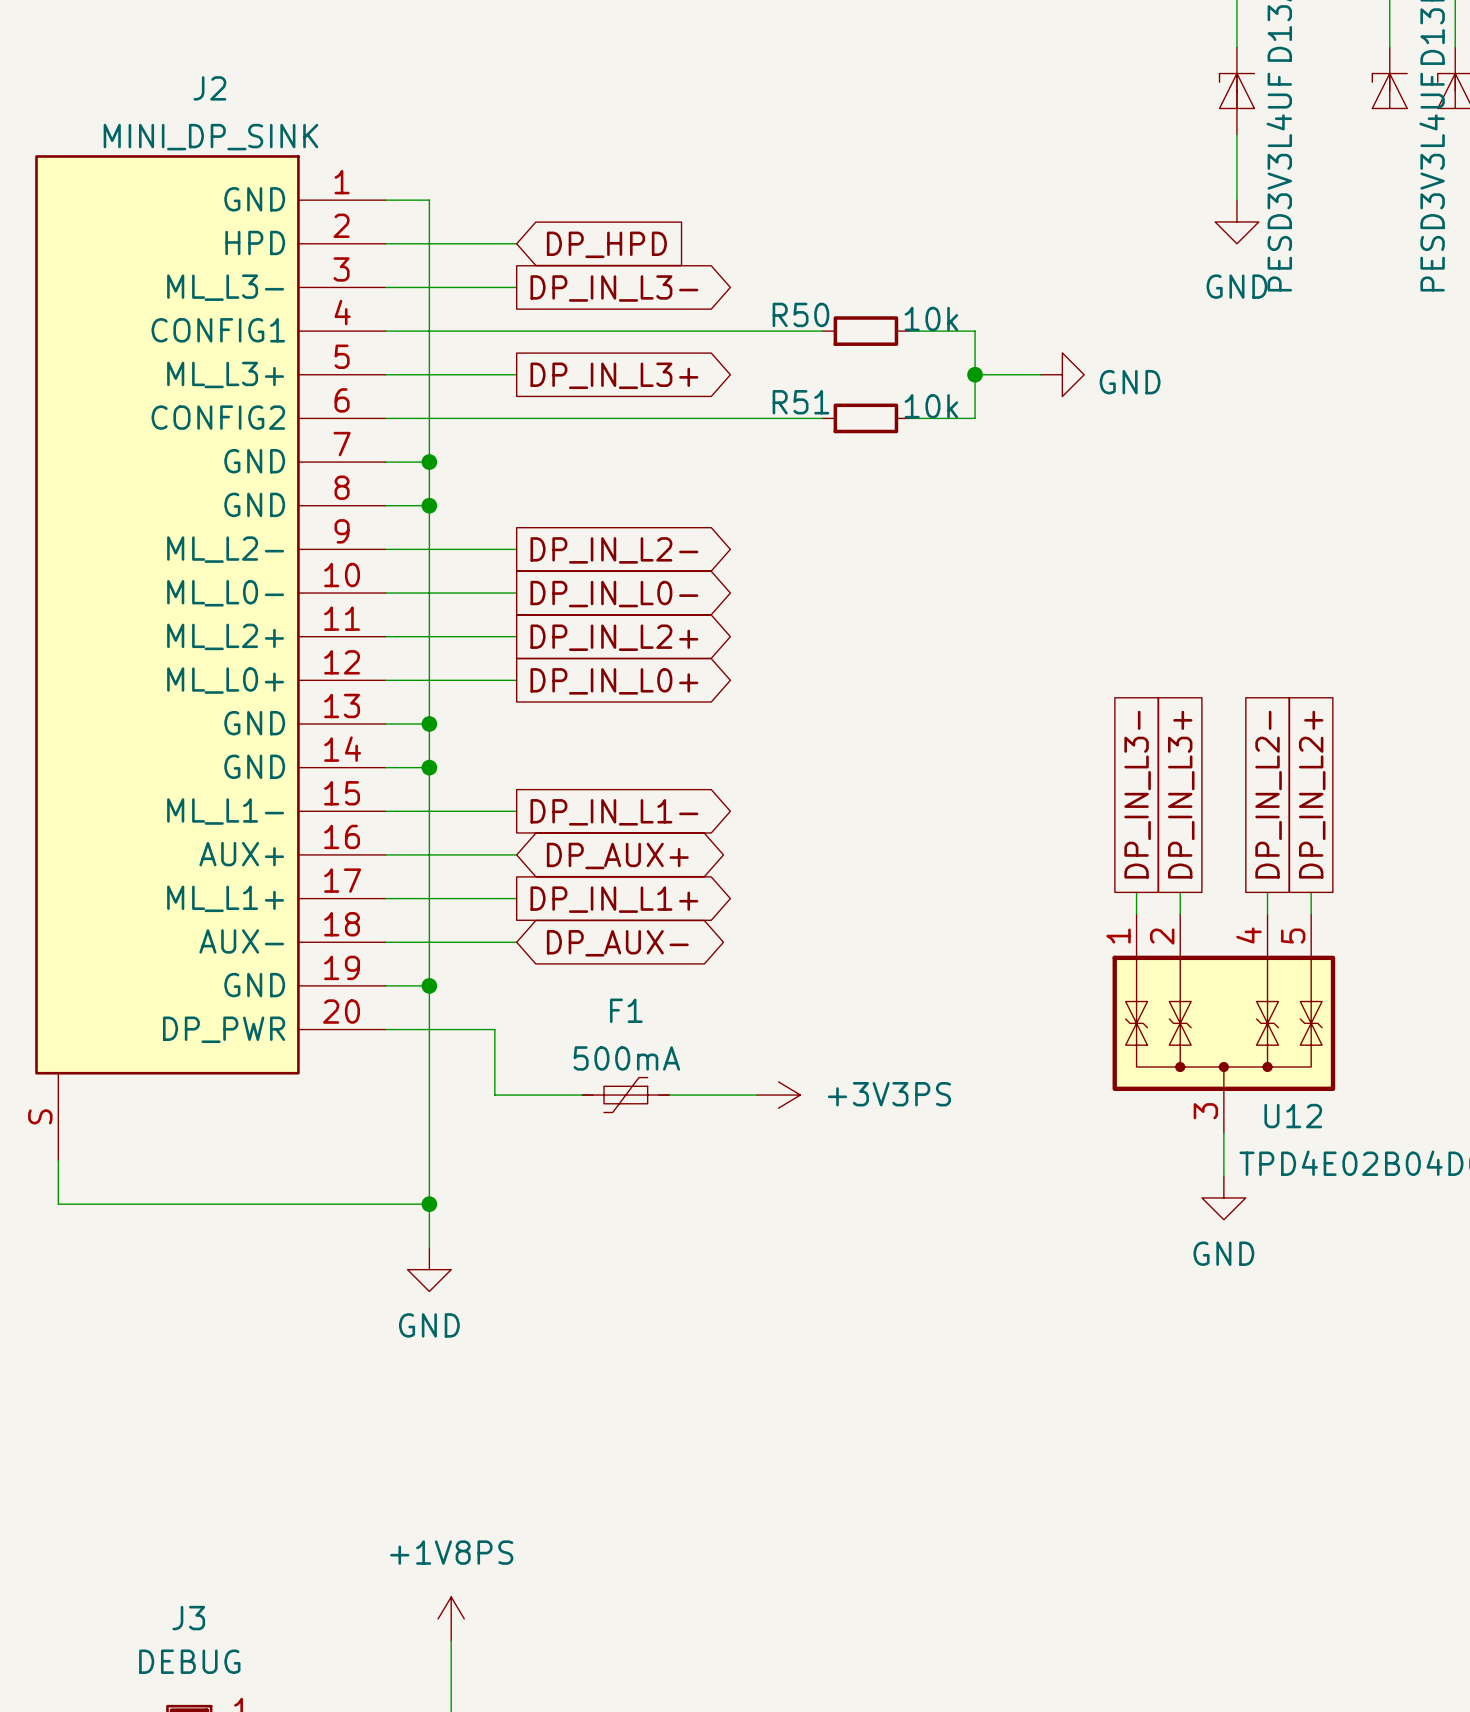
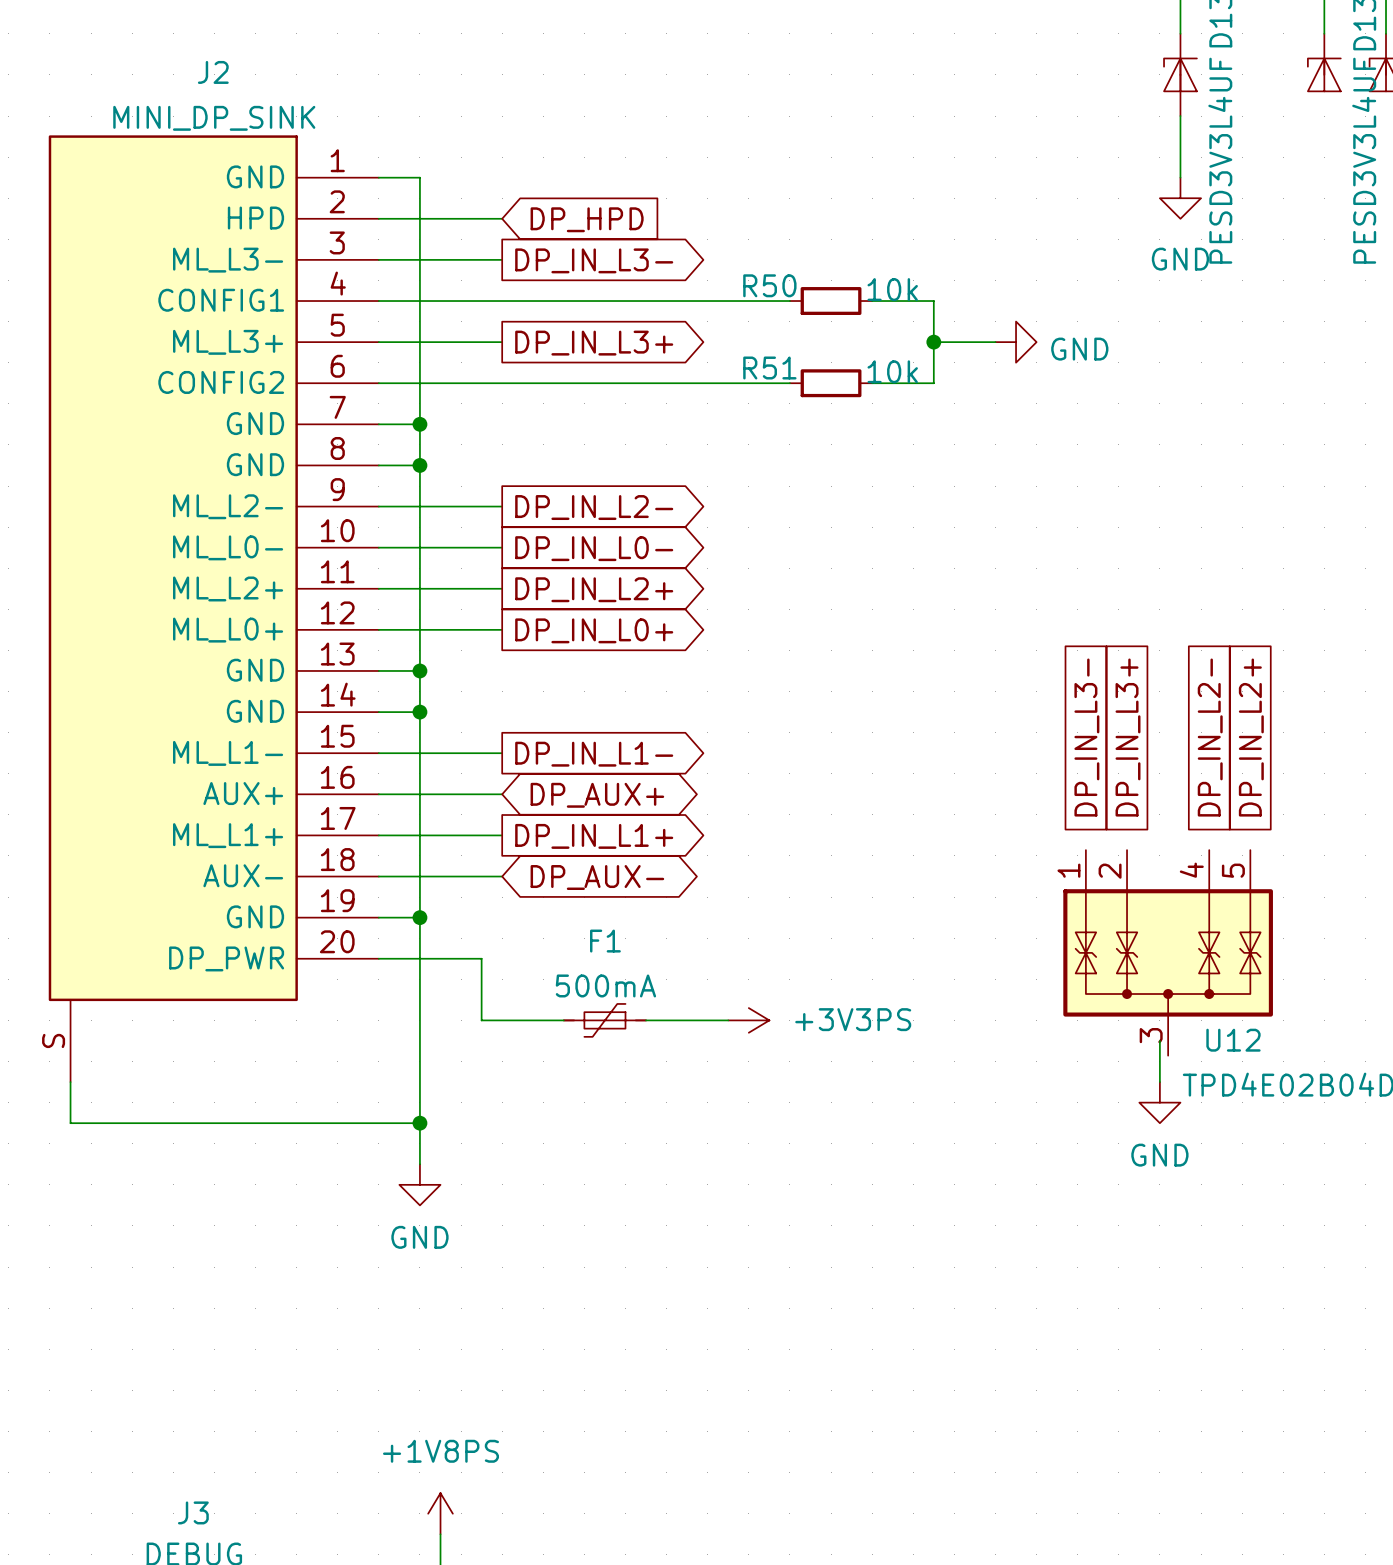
wire: (1136, 892) (1136, 914) -> none
wire: (1180, 892) (1180, 914) -> none
wire: (1267, 892) (1267, 914) -> none
wire: (1311, 892) (1311, 914) -> none
wire: (1223, 1132) (1223, 1176) -> (1159, 1040) (1159, 1082)
power symbol position: GND (1223, 1197) -> GND (1159, 1102)

